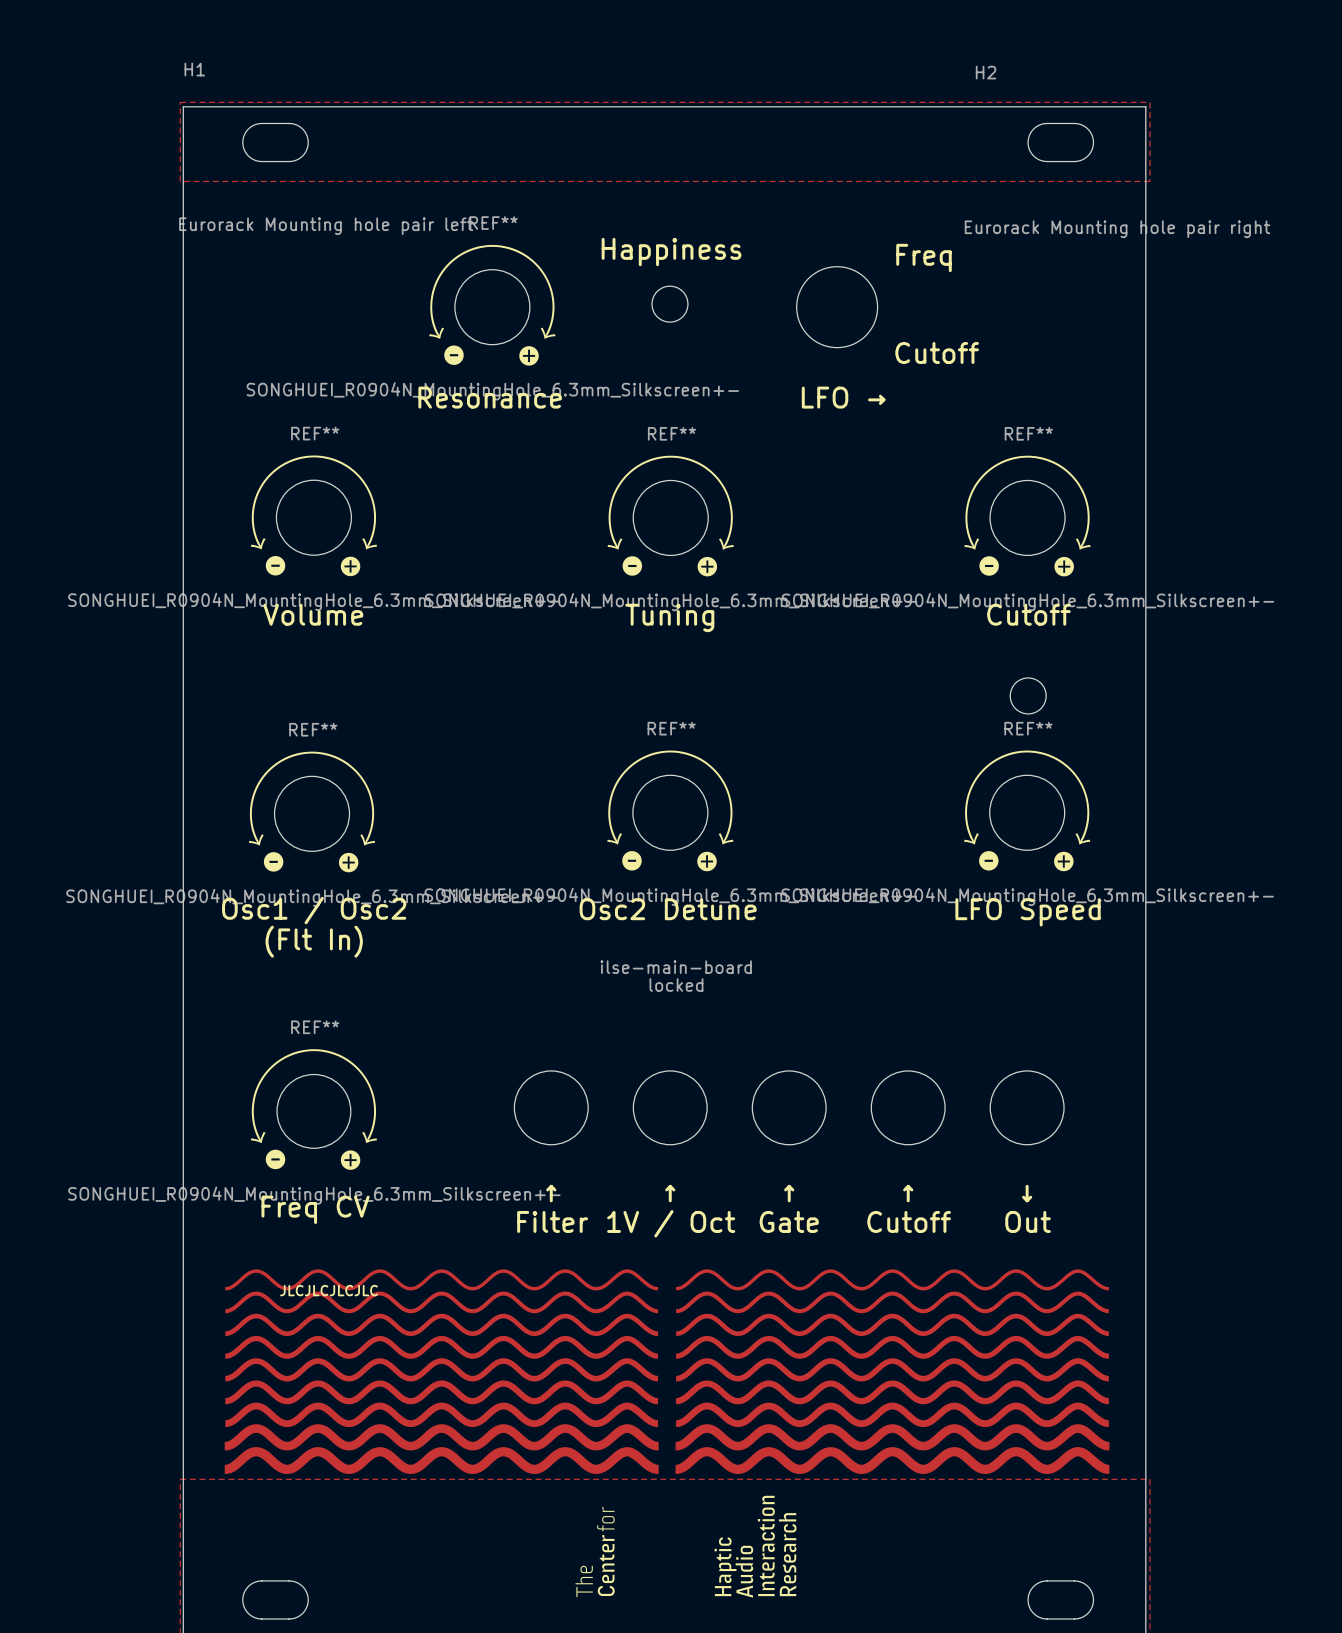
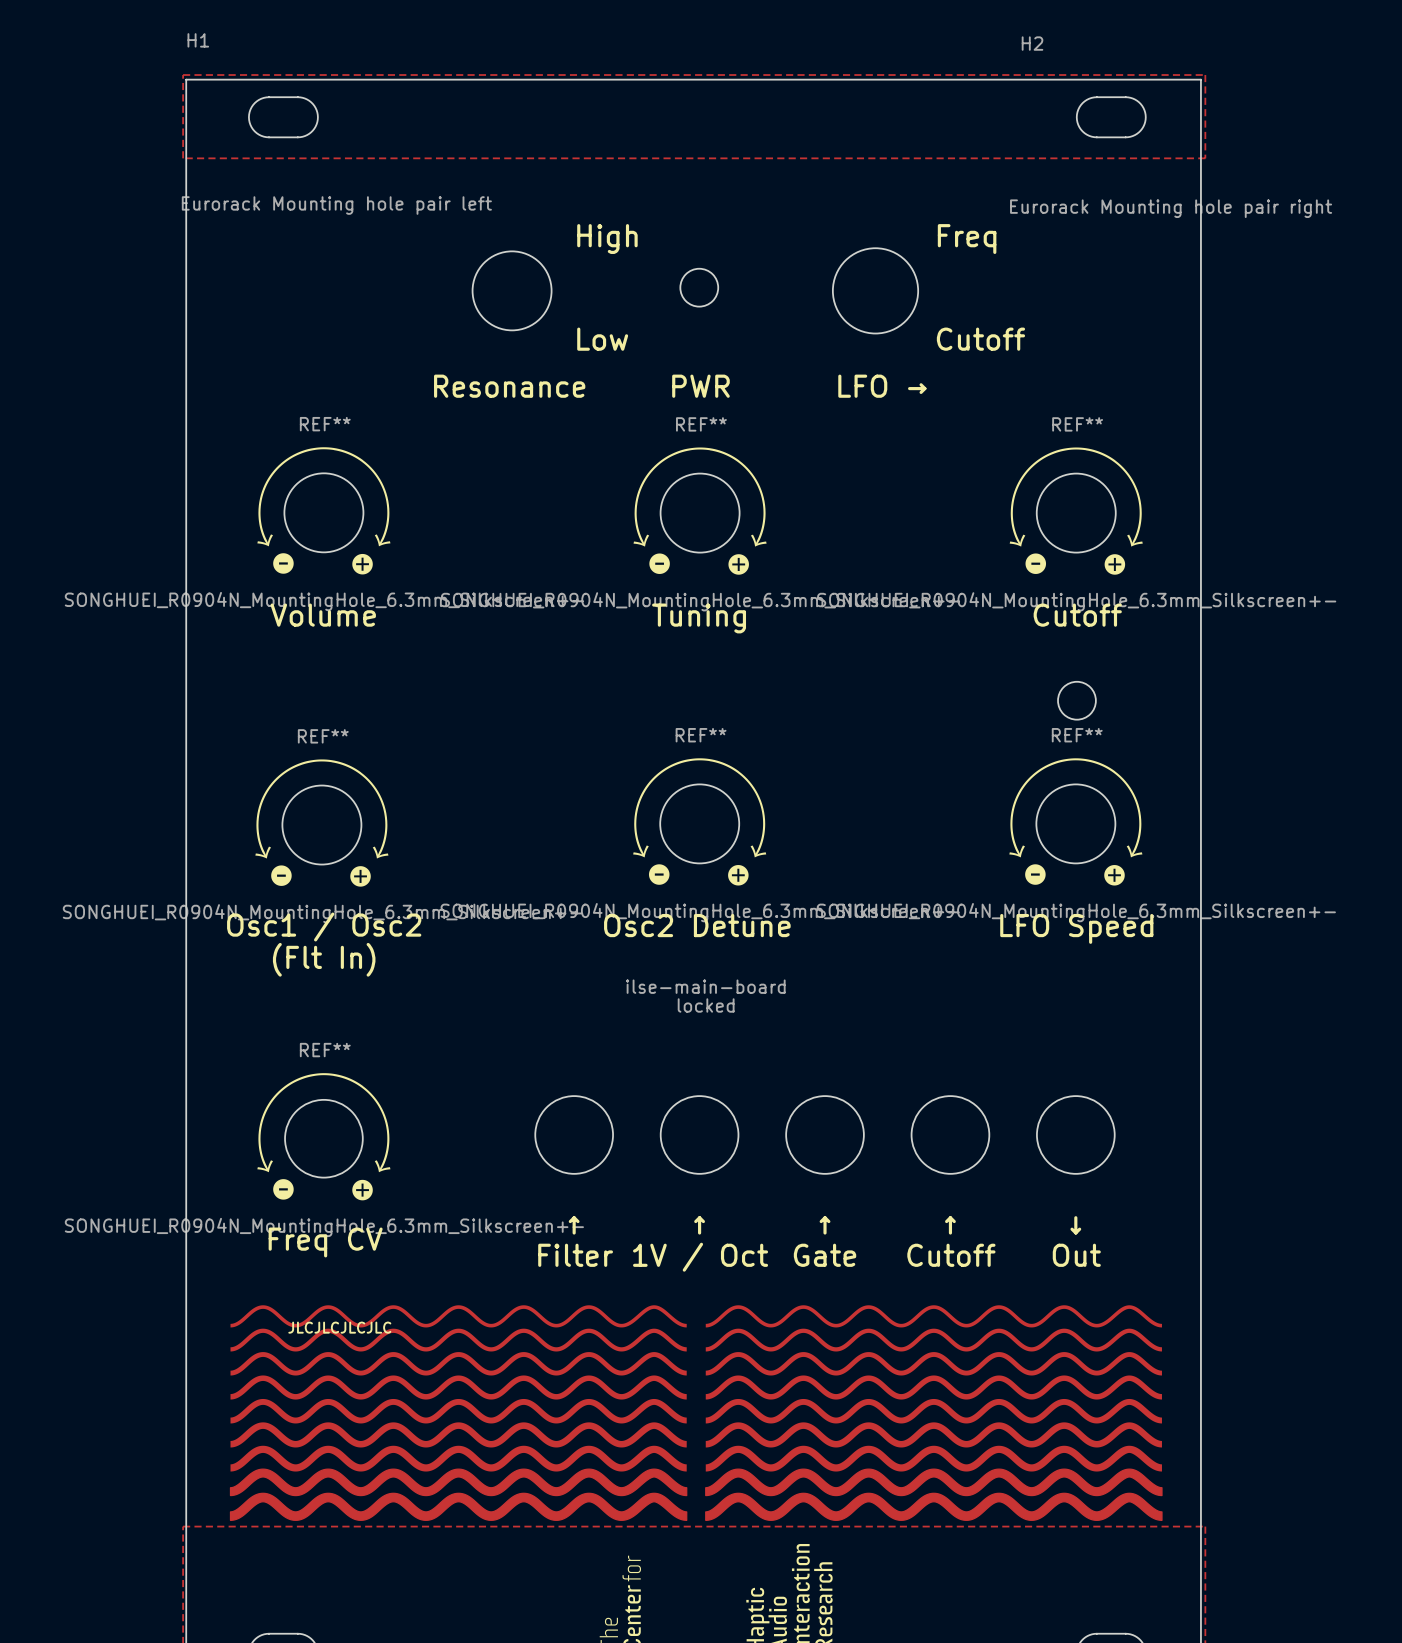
text: Happiness (671, 252) -> none
text: none -> High (607, 239)
REF**: SONGHUEI_R0904N_MountingHole_6.3mm_Silkscreen+- (492, 305) -> none
text: none -> Low (602, 339)
text: none -> PWR (700, 386)

